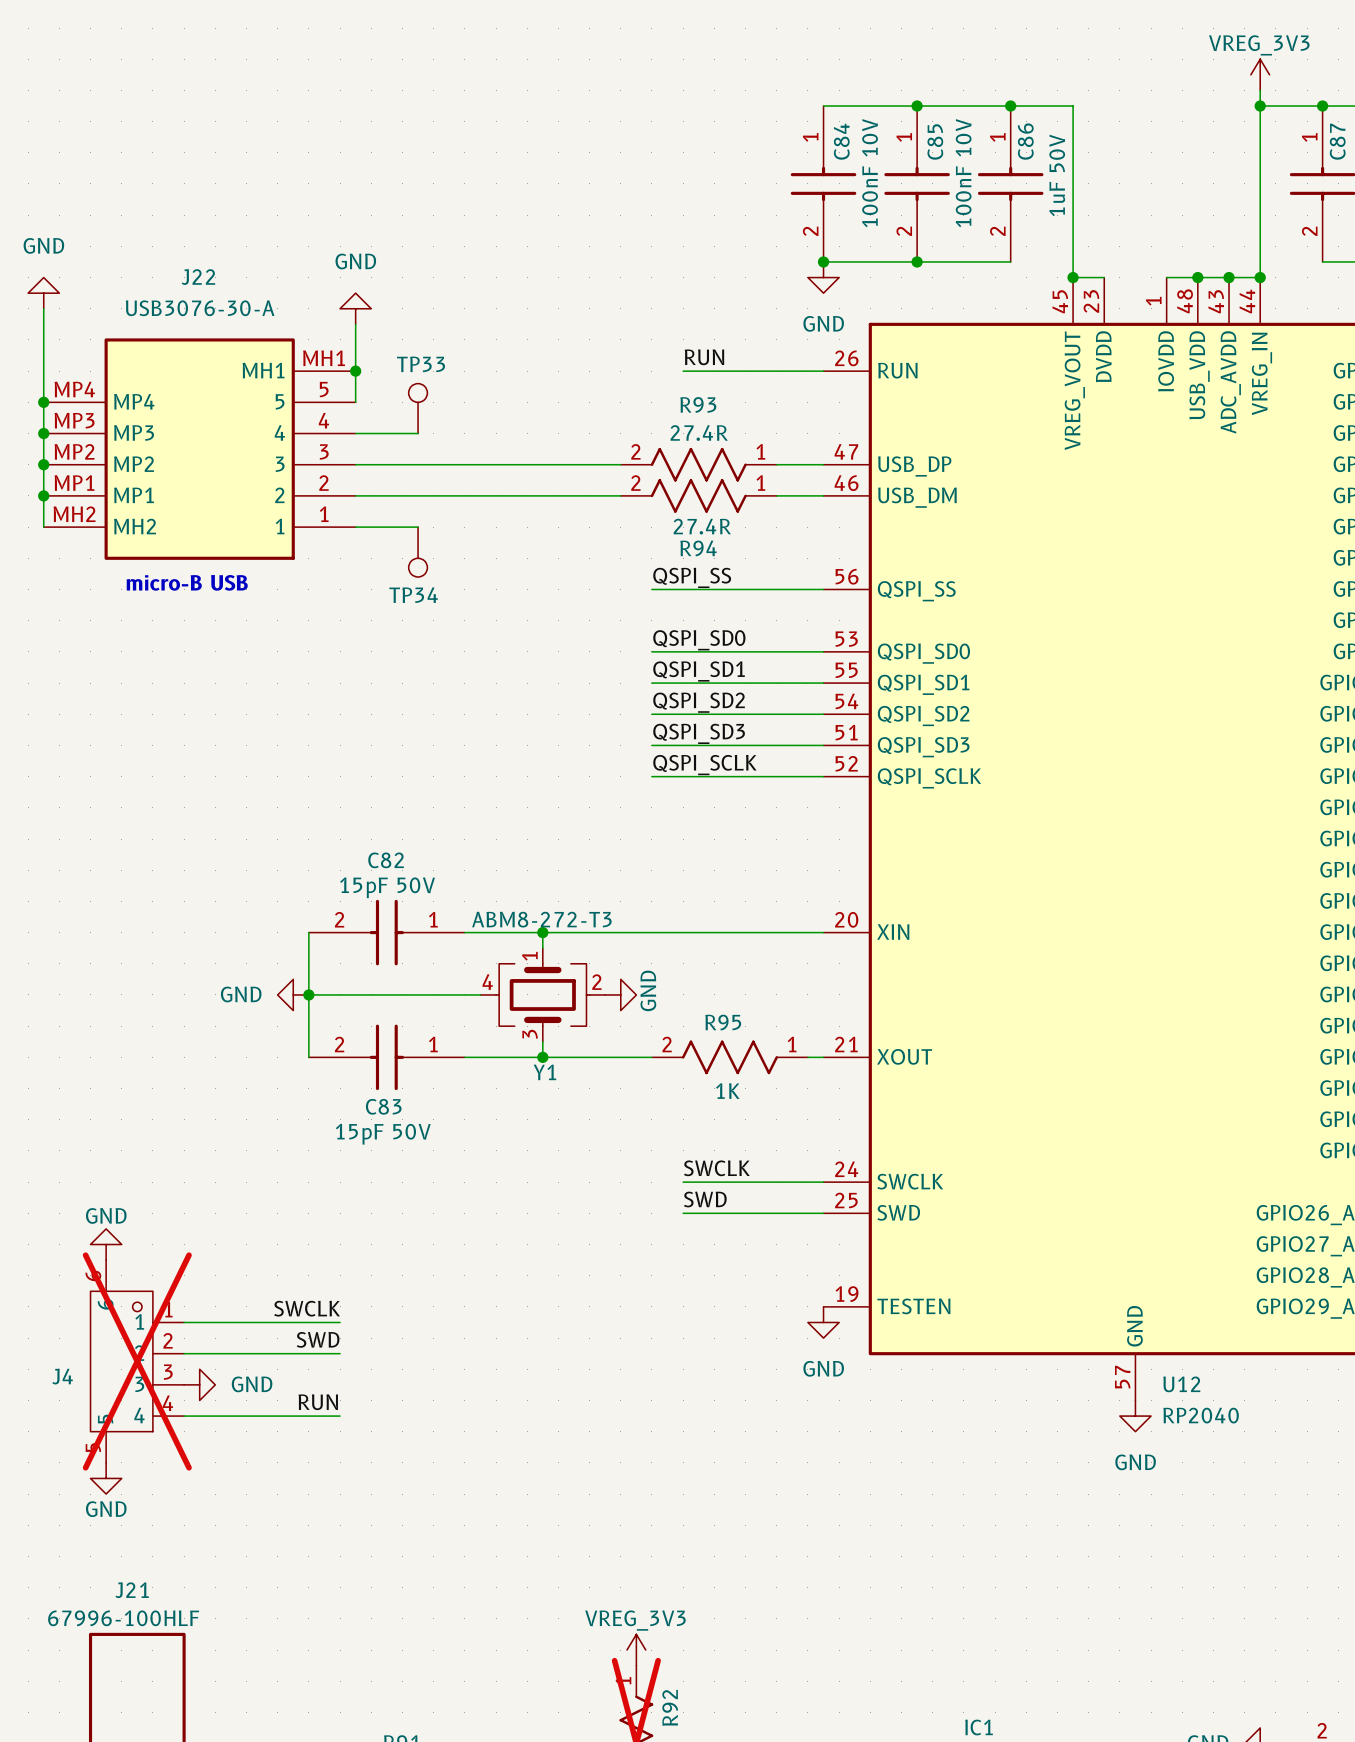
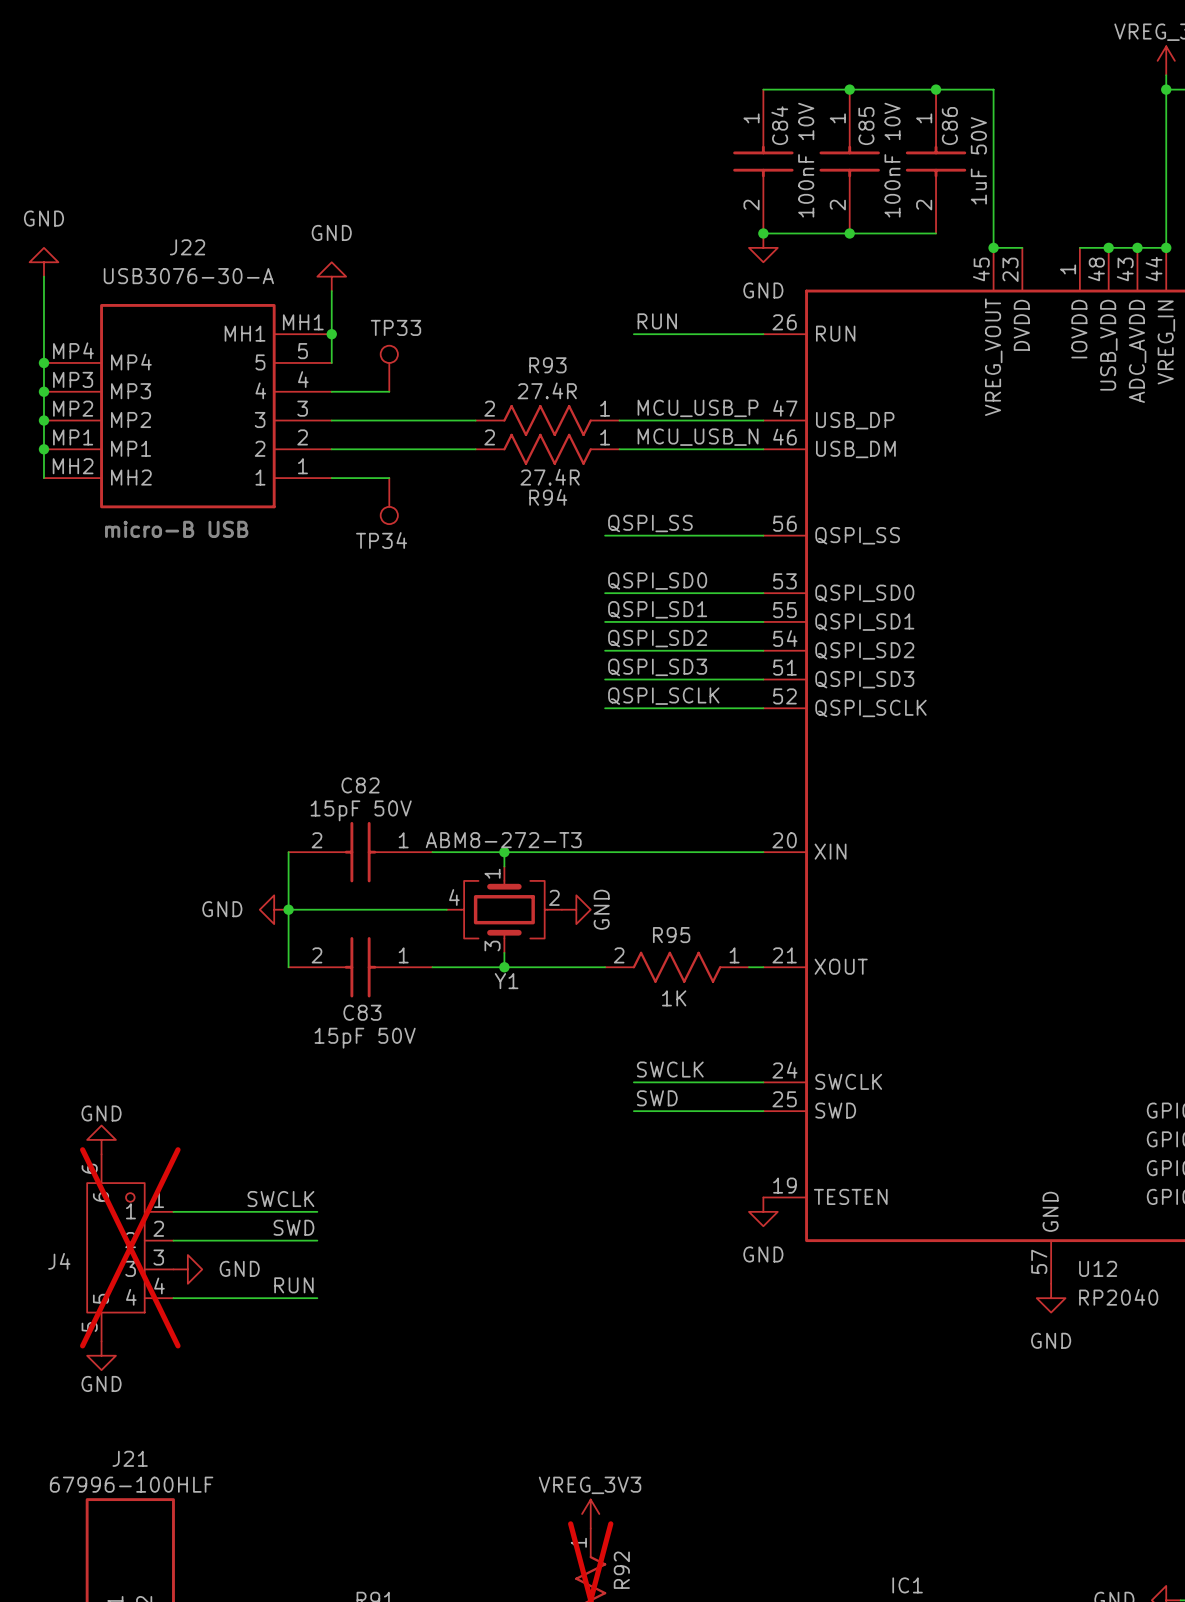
label: none -> MCU_USB_P (698, 408)
wire: (511, 464) (620, 464) -> (619, 420) (720, 420)
R93 position: (698, 464) -> (547, 420)
label: none -> MCU_USB_N (698, 437)
wire: (511, 495) (620, 495) -> (619, 449) (720, 449)
R94 position: (698, 495) -> (547, 449)

